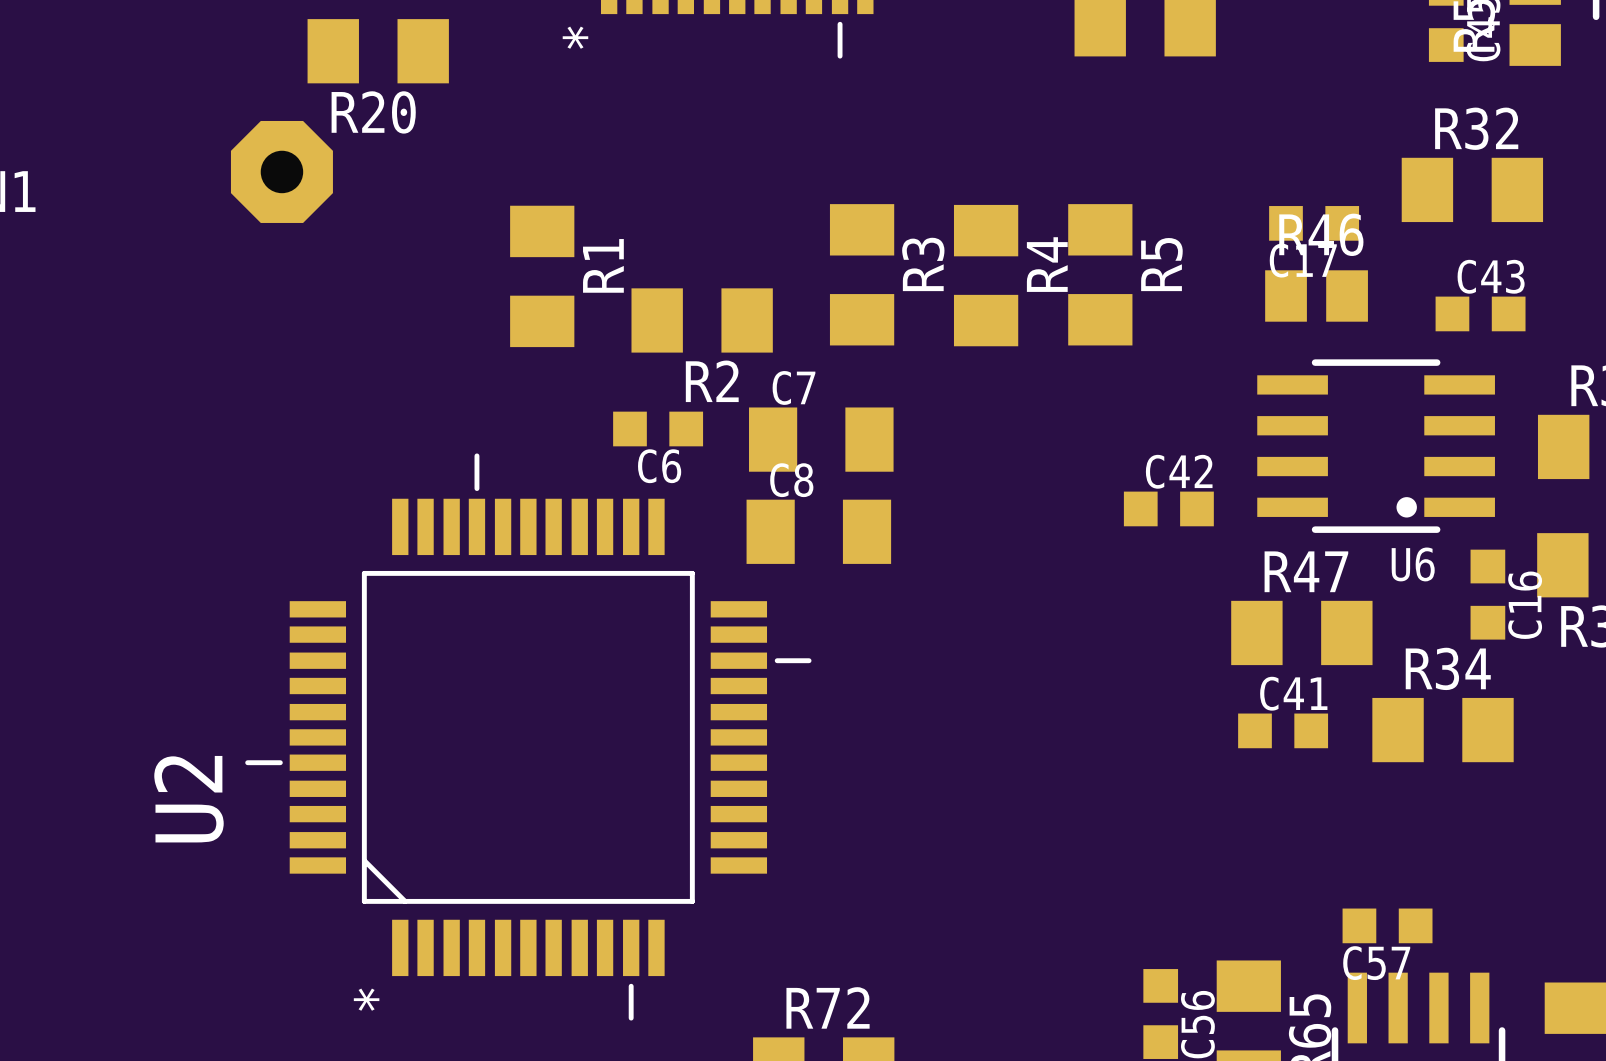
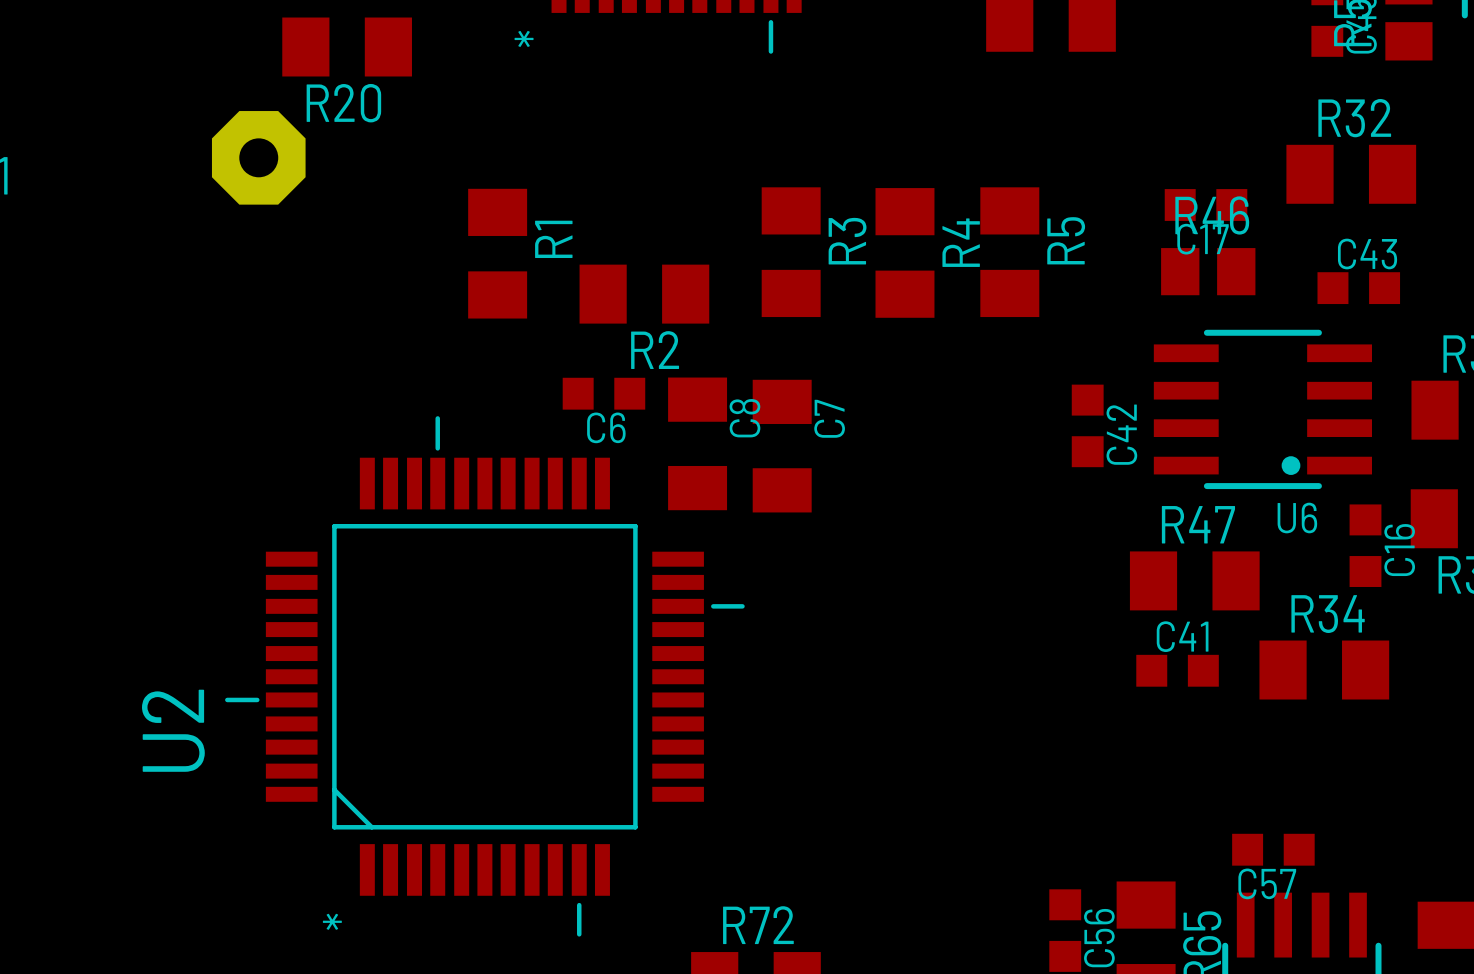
C7 rotation: 0° (821, 439) -> 90° clockwise (782, 446)
C42 rotation: 0° (1168, 508) -> 90° clockwise (1087, 425)
C8 rotation: 0° (818, 531) -> 90° clockwise (697, 443)

